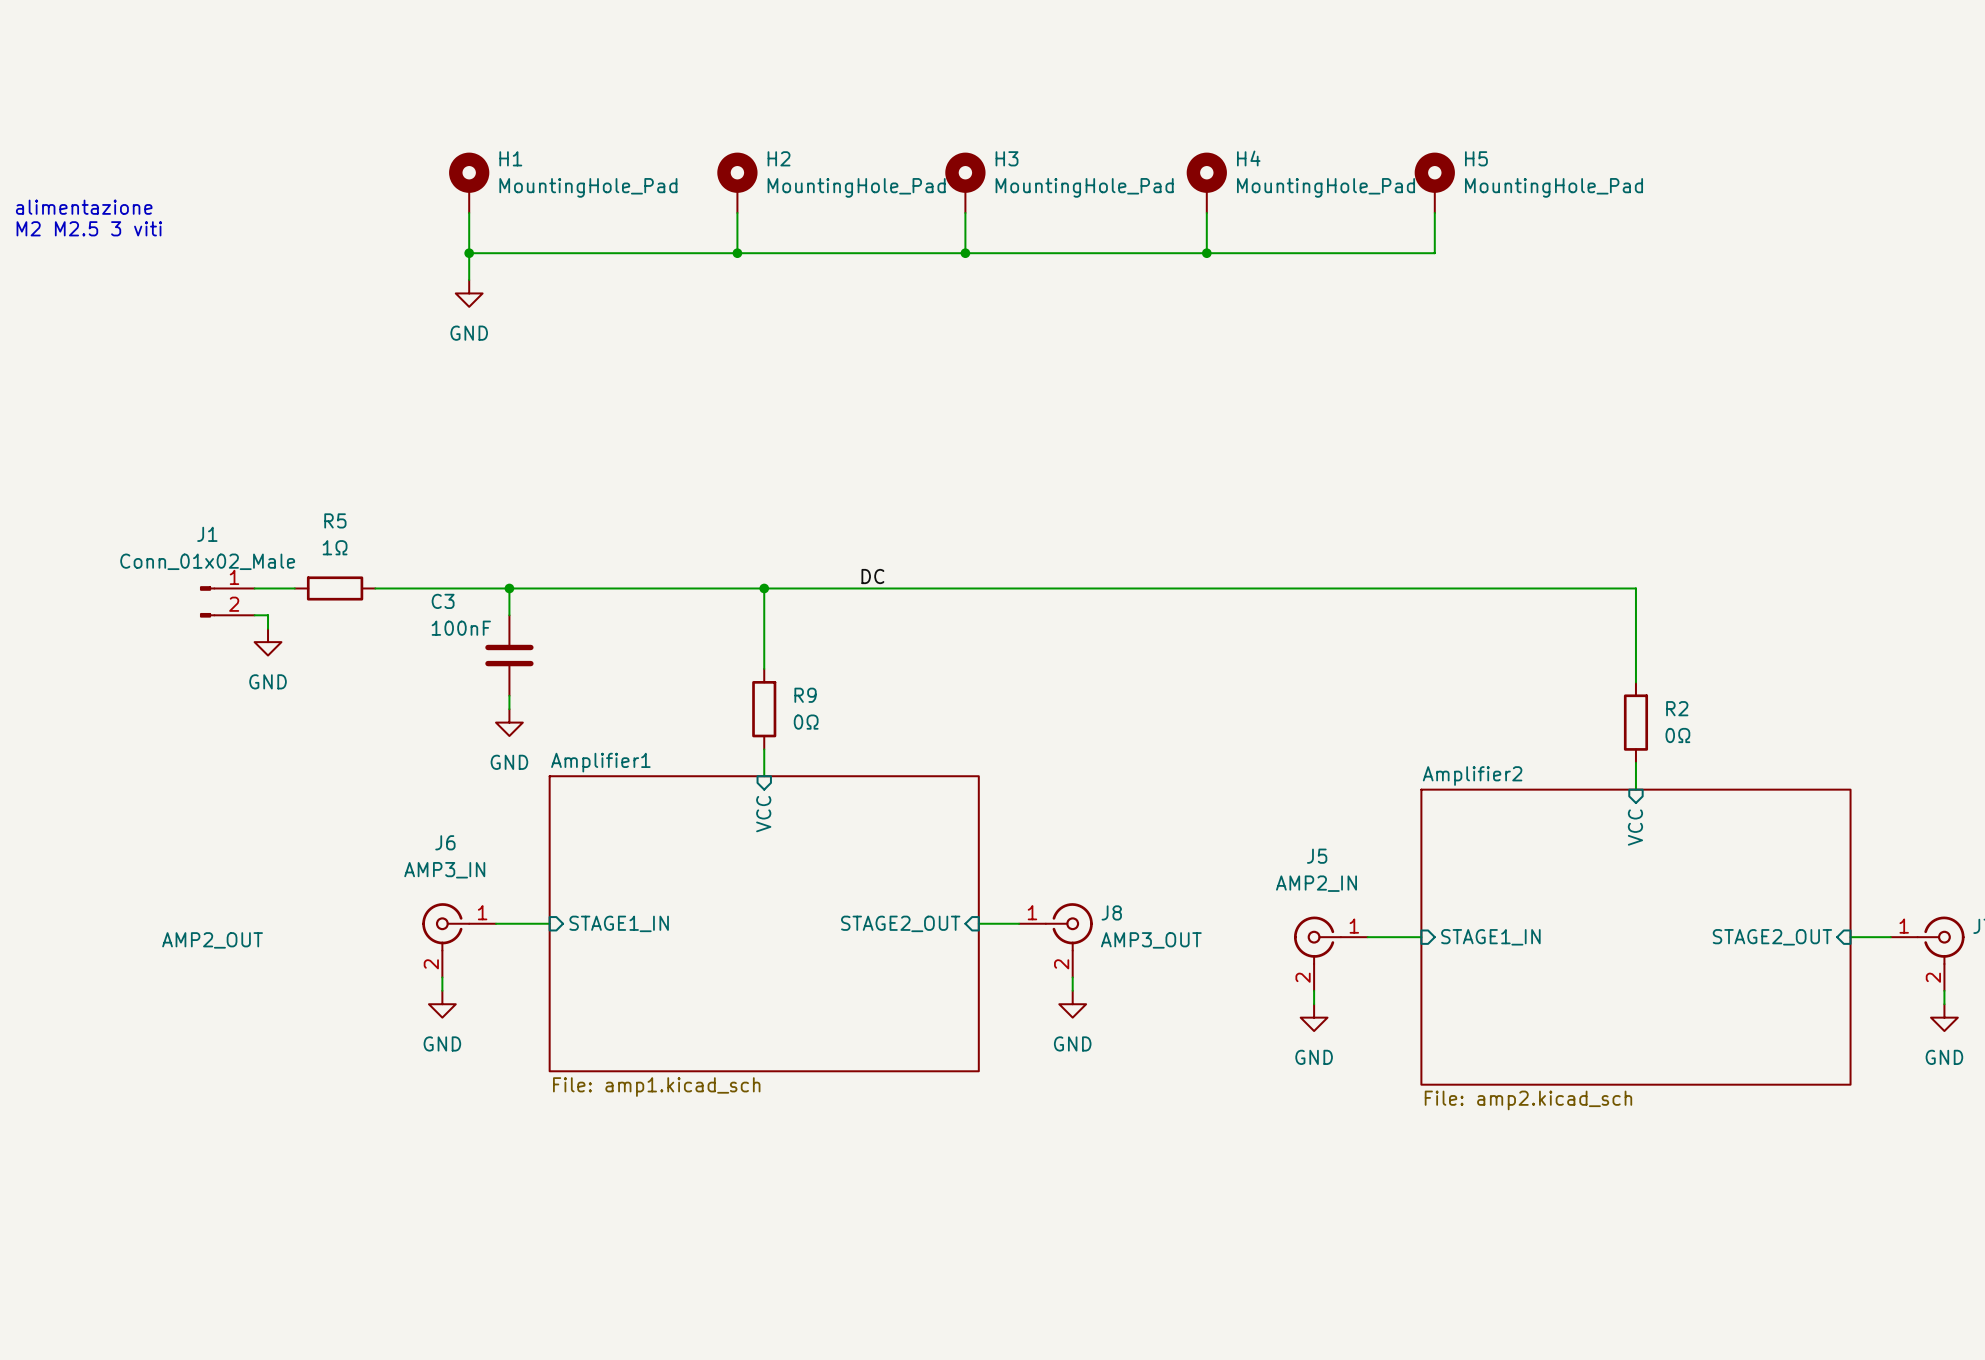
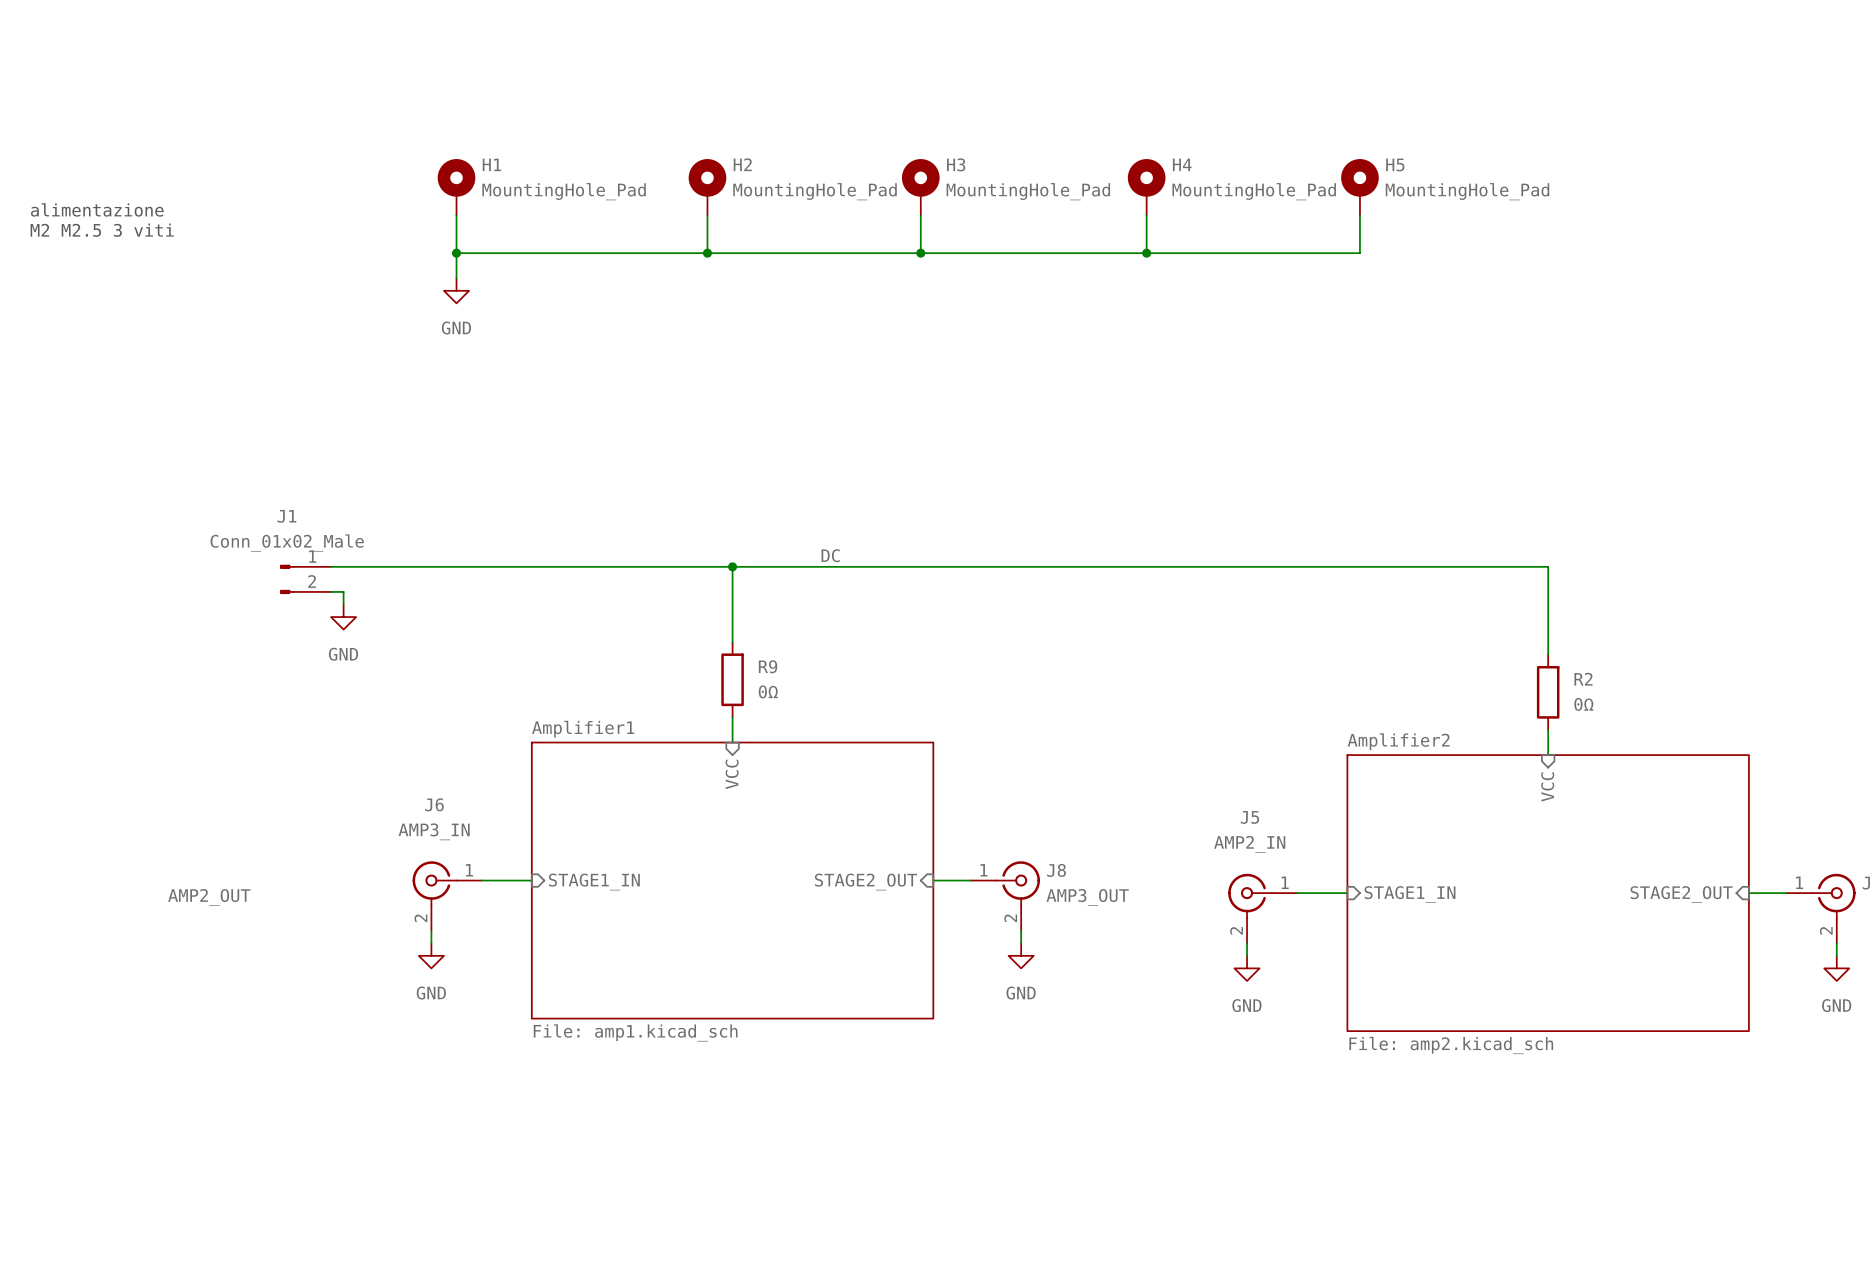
wire: (254, 588) (294, 588) -> (331, 566) (368, 566)
R5: 1Ω (335, 588) -> none
wire: (509, 588) (509, 615) -> none
junction: (509, 588) -> none
J1 position: (227, 601) -> (305, 579)
wire: (254, 615) (268, 615) (268, 628) -> (331, 591) (343, 591) (343, 604)
power symbol position: GND (268, 642) -> GND (343, 617)
C3: 100nF (509, 655) -> none
wire: (509, 695) (509, 709) -> none
power symbol: GND (509, 722) -> none

